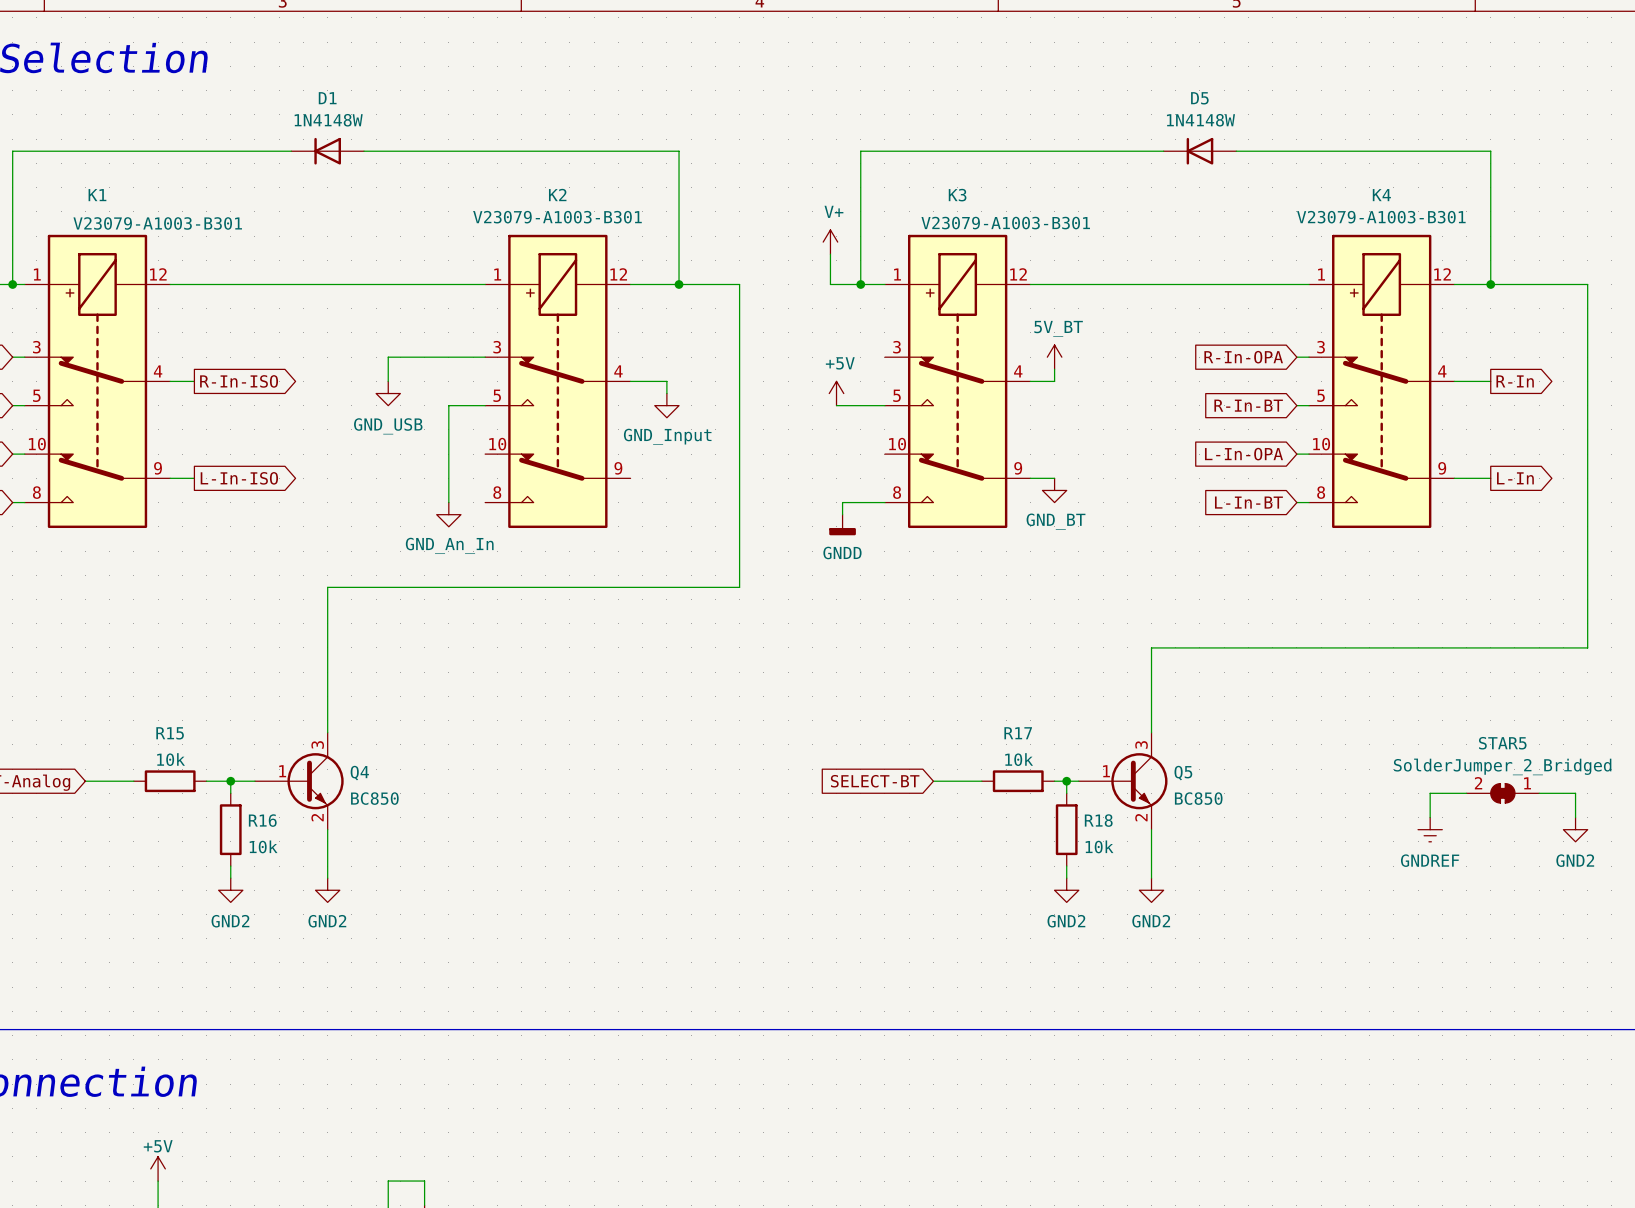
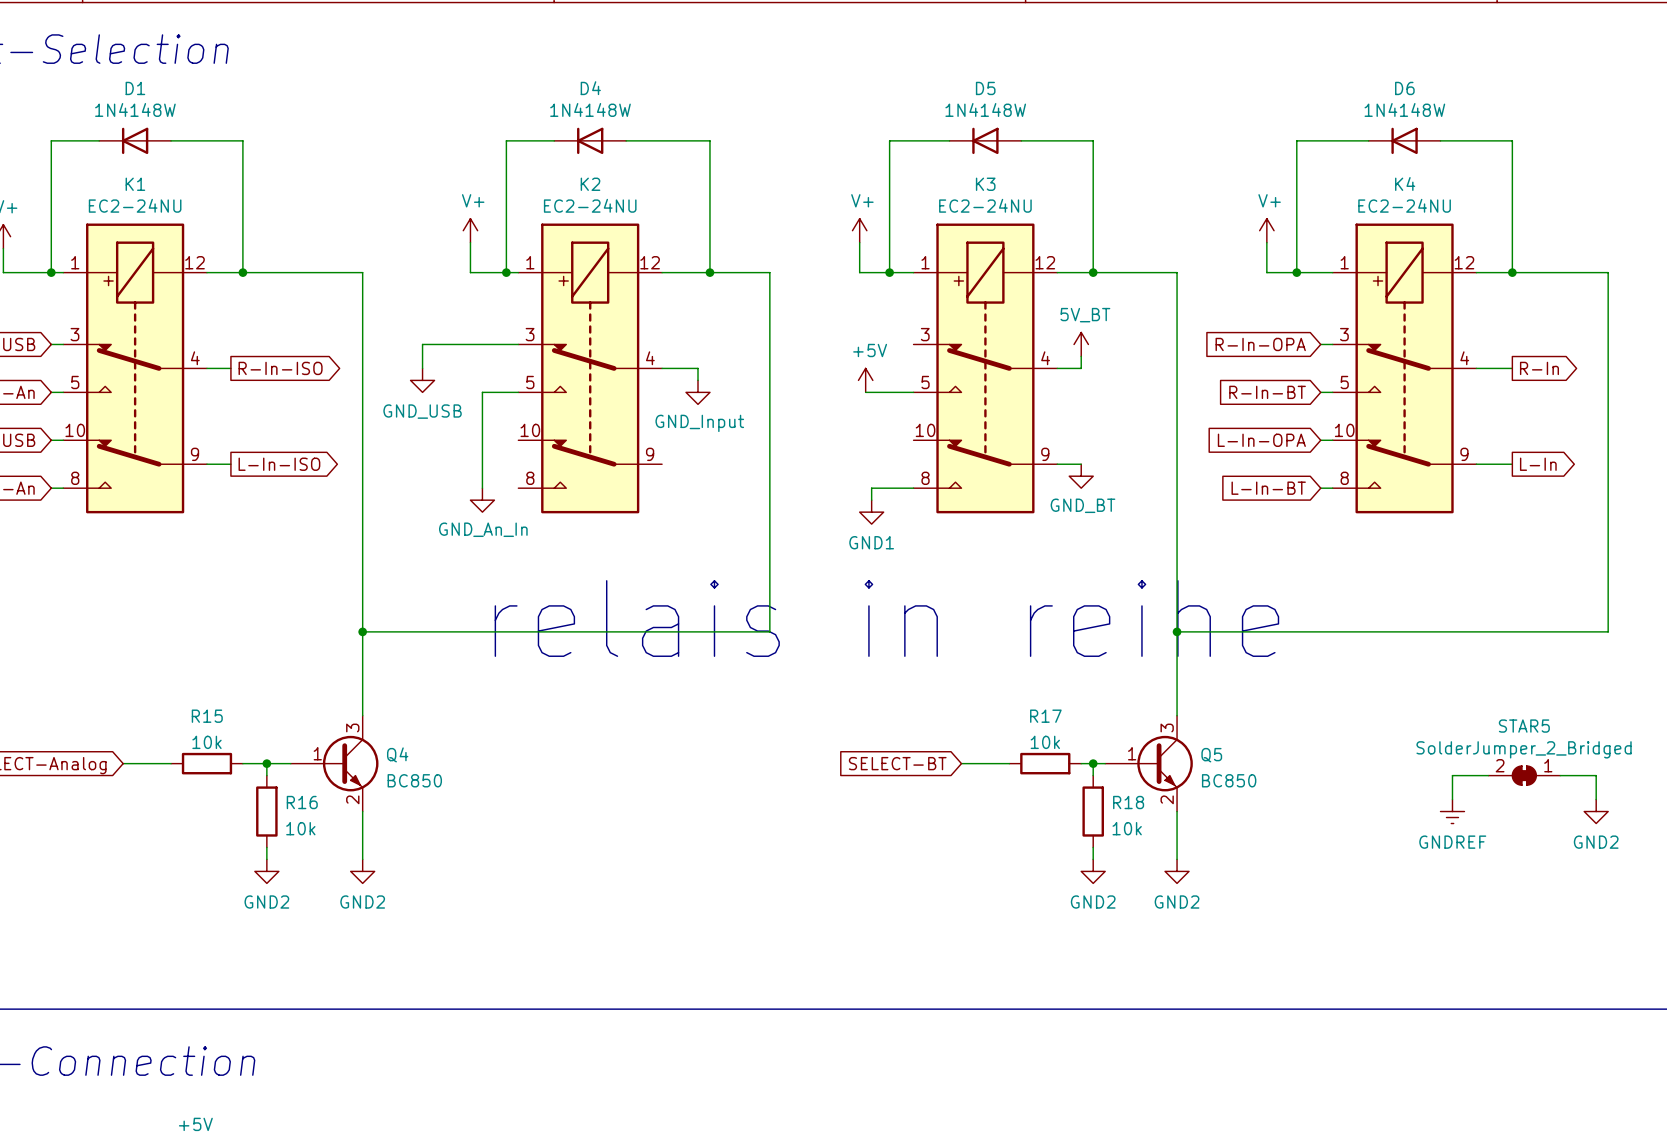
wire: (206, 151) (291, 151) -> (242, 140) (242, 272)
D1 position: (327, 151) -> (135, 140)
wire: (364, 151) (473, 151) -> (506, 272) (506, 140)
D4: none -> 1N4148W (590, 140)
wire: (1066, 151) (1163, 151) -> (1093, 140) (1093, 272)
D5 position: (1199, 151) -> (985, 140)
wire: (1236, 151) (1272, 151) -> (1296, 272) (1296, 140)
D6: none -> 1N4148W (1404, 140)
K2 value: V23079-A1003-B301 (557, 217) -> EC2-24NU (590, 205)
K4 value: V23079-A1003-B301 (1381, 217) -> EC2-24NU (1404, 205)
K1 value: V23079-A1003-B301 (157, 223) -> EC2-24NU (135, 205)
K3 value: V23079-A1003-B301 (1005, 223) -> EC2-24NU (985, 205)
power symbol: none -> V+ (470, 230)
power symbol: none -> V+ (1266, 230)
junction: none -> (242, 272)
wire: (327, 284) (436, 284) -> (470, 242) (470, 272)
wire: none -> (362, 272) (362, 572)
junction: none -> (506, 272)
junction: none -> (1093, 272)
wire: (1151, 284) (1242, 284) -> (1266, 242) (1266, 272)
wire: none -> (1177, 272) (1177, 631)
junction: none -> (1296, 272)
power symbol: GNDD (842, 524) -> GND1 (871, 512)
wire: (327, 587) (739, 587) -> (362, 631) (769, 631) (769, 572)
text: none -> relais in reihe (886, 618)
junction: none -> (362, 631)
junction: none -> (1177, 631)

